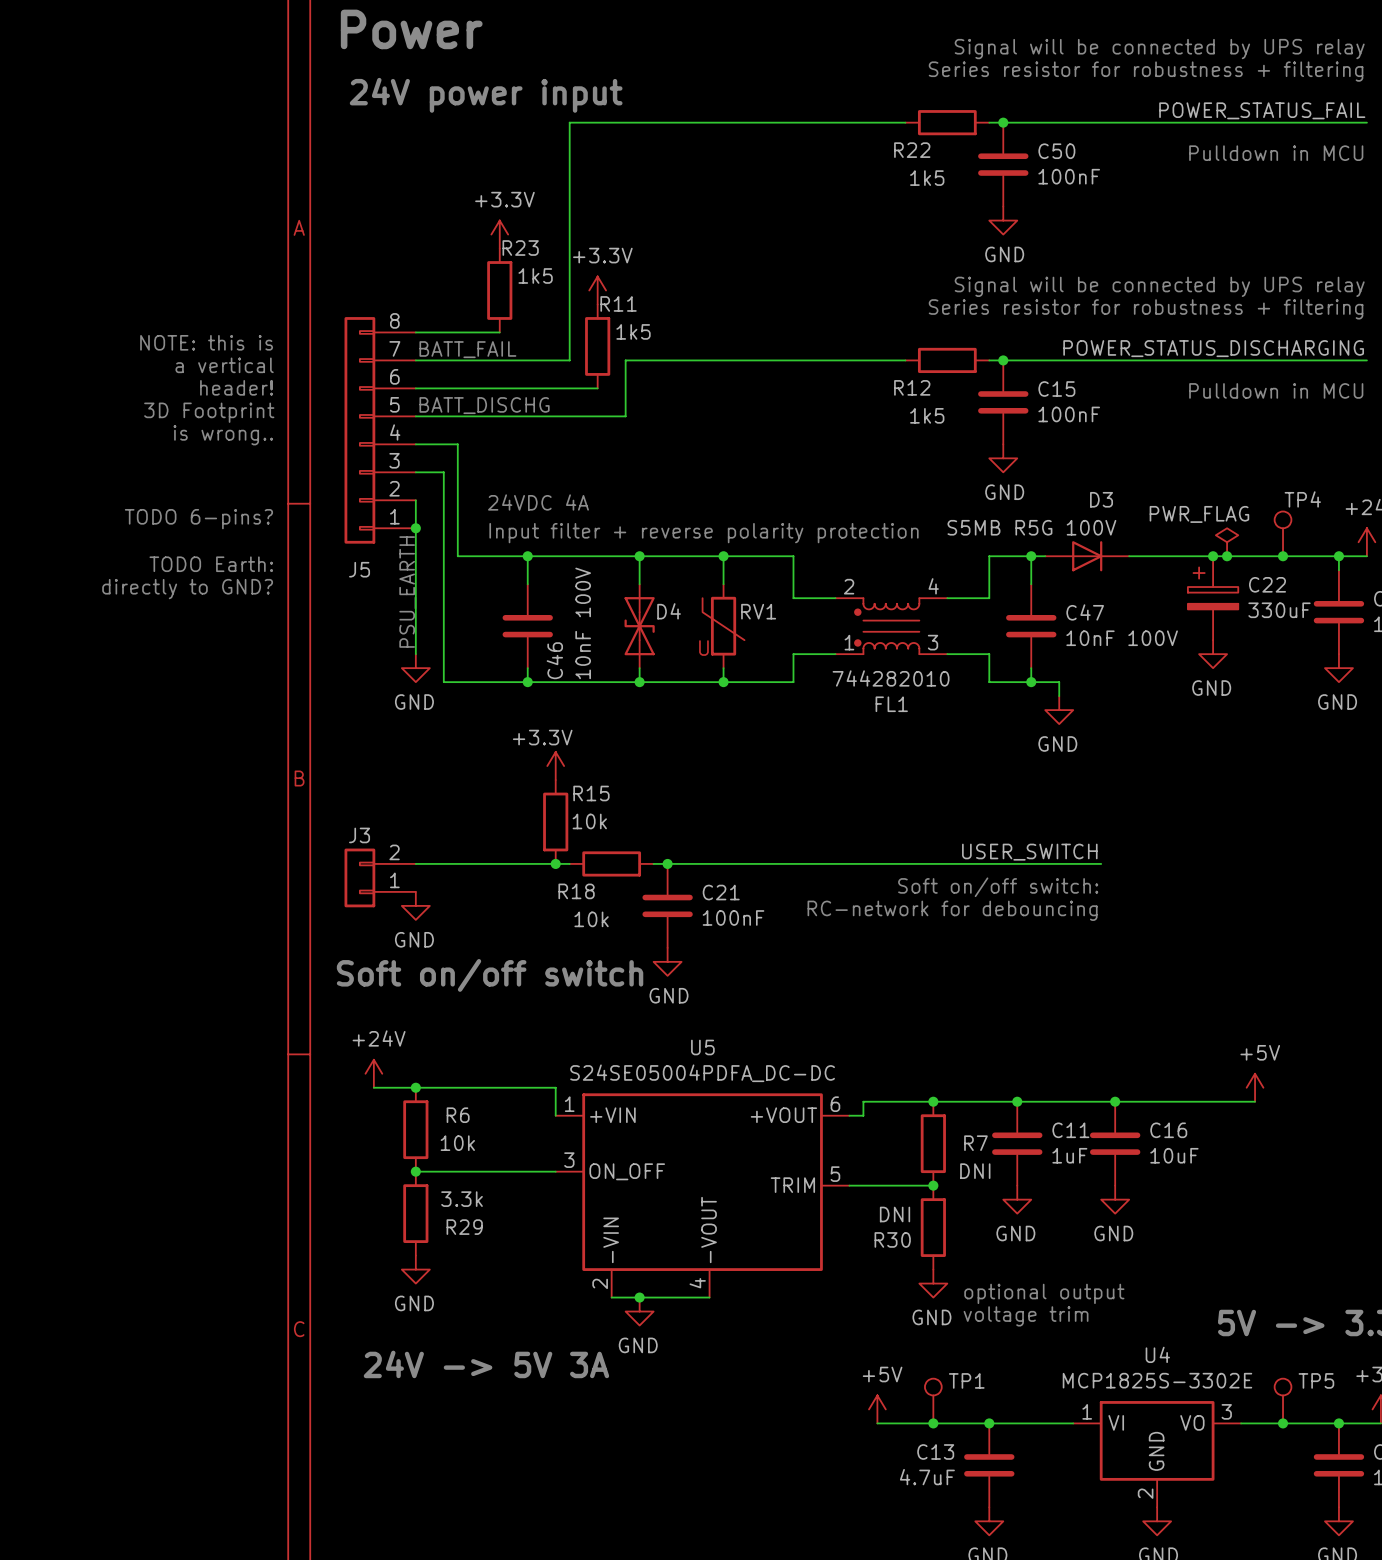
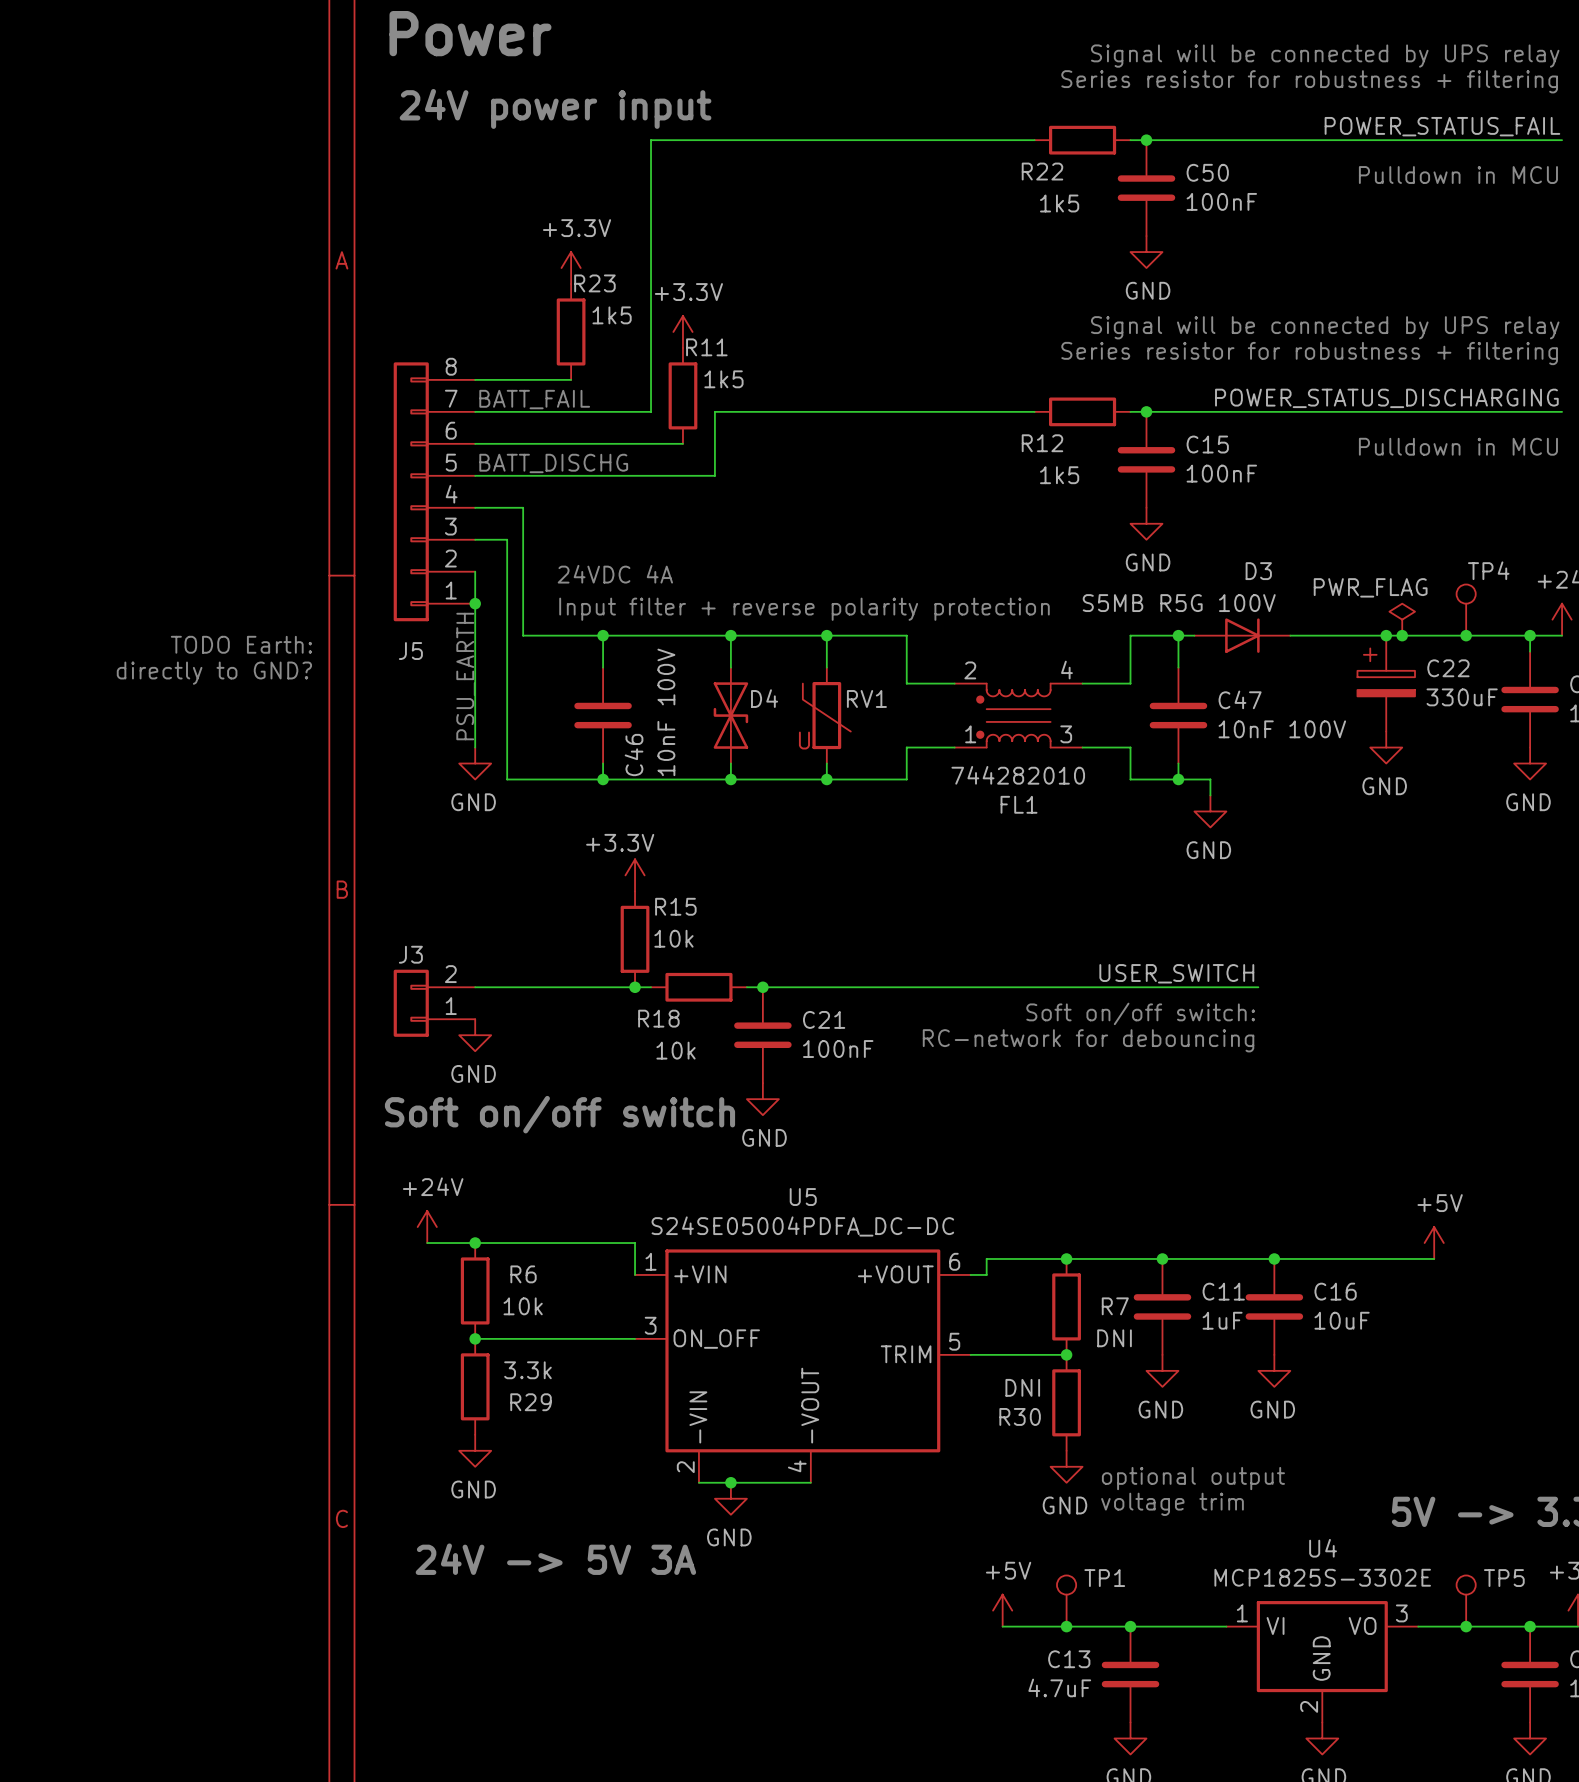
text: NOTE: this is (206, 342) -> none
text: a vertical (224, 365) -> none
text: header! (236, 387) -> none
text: 3D Footprint (209, 412) -> none
text: is wrong.. (223, 435) -> none
text: TODO 6-pins? (198, 519) -> none

